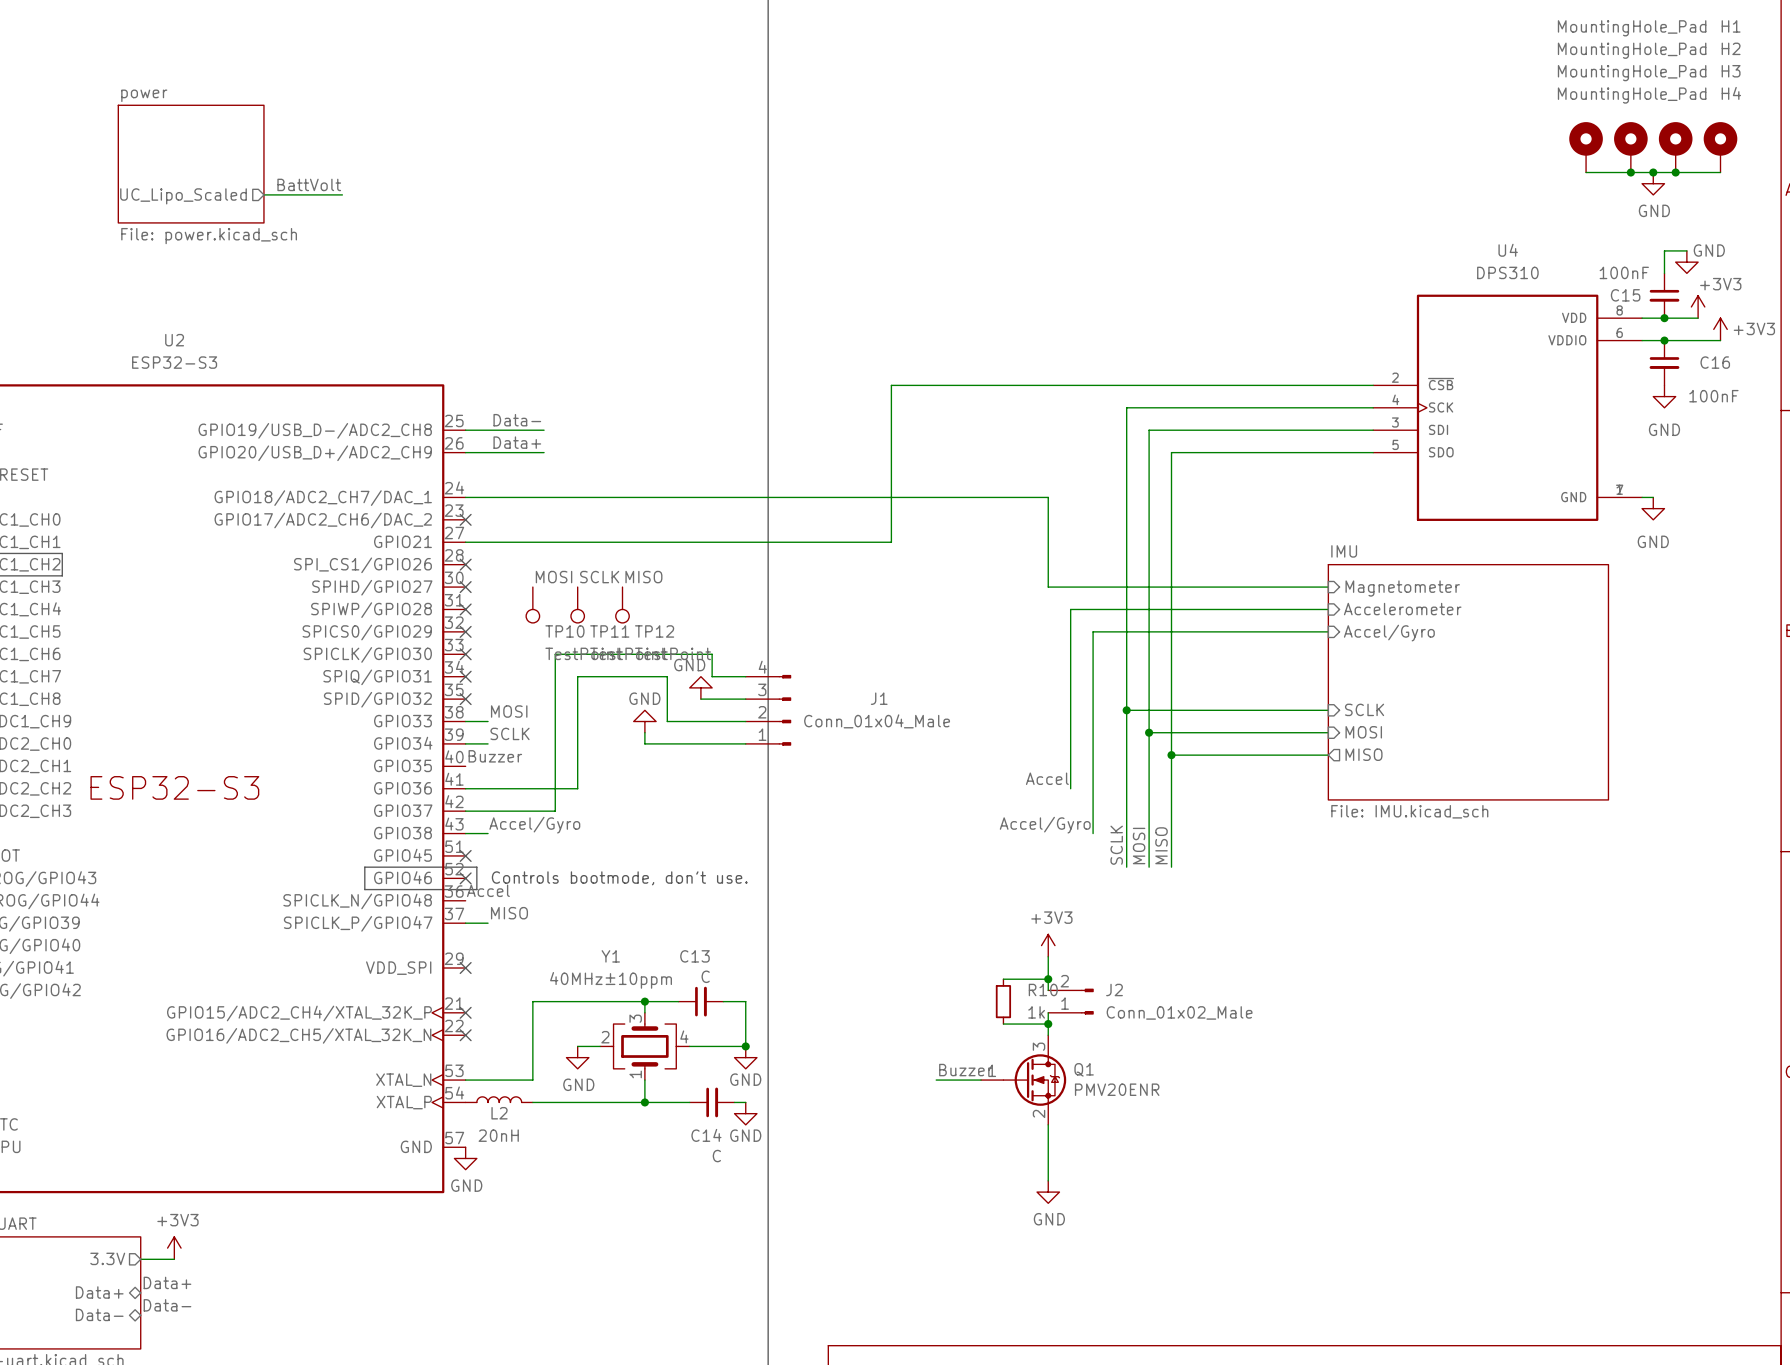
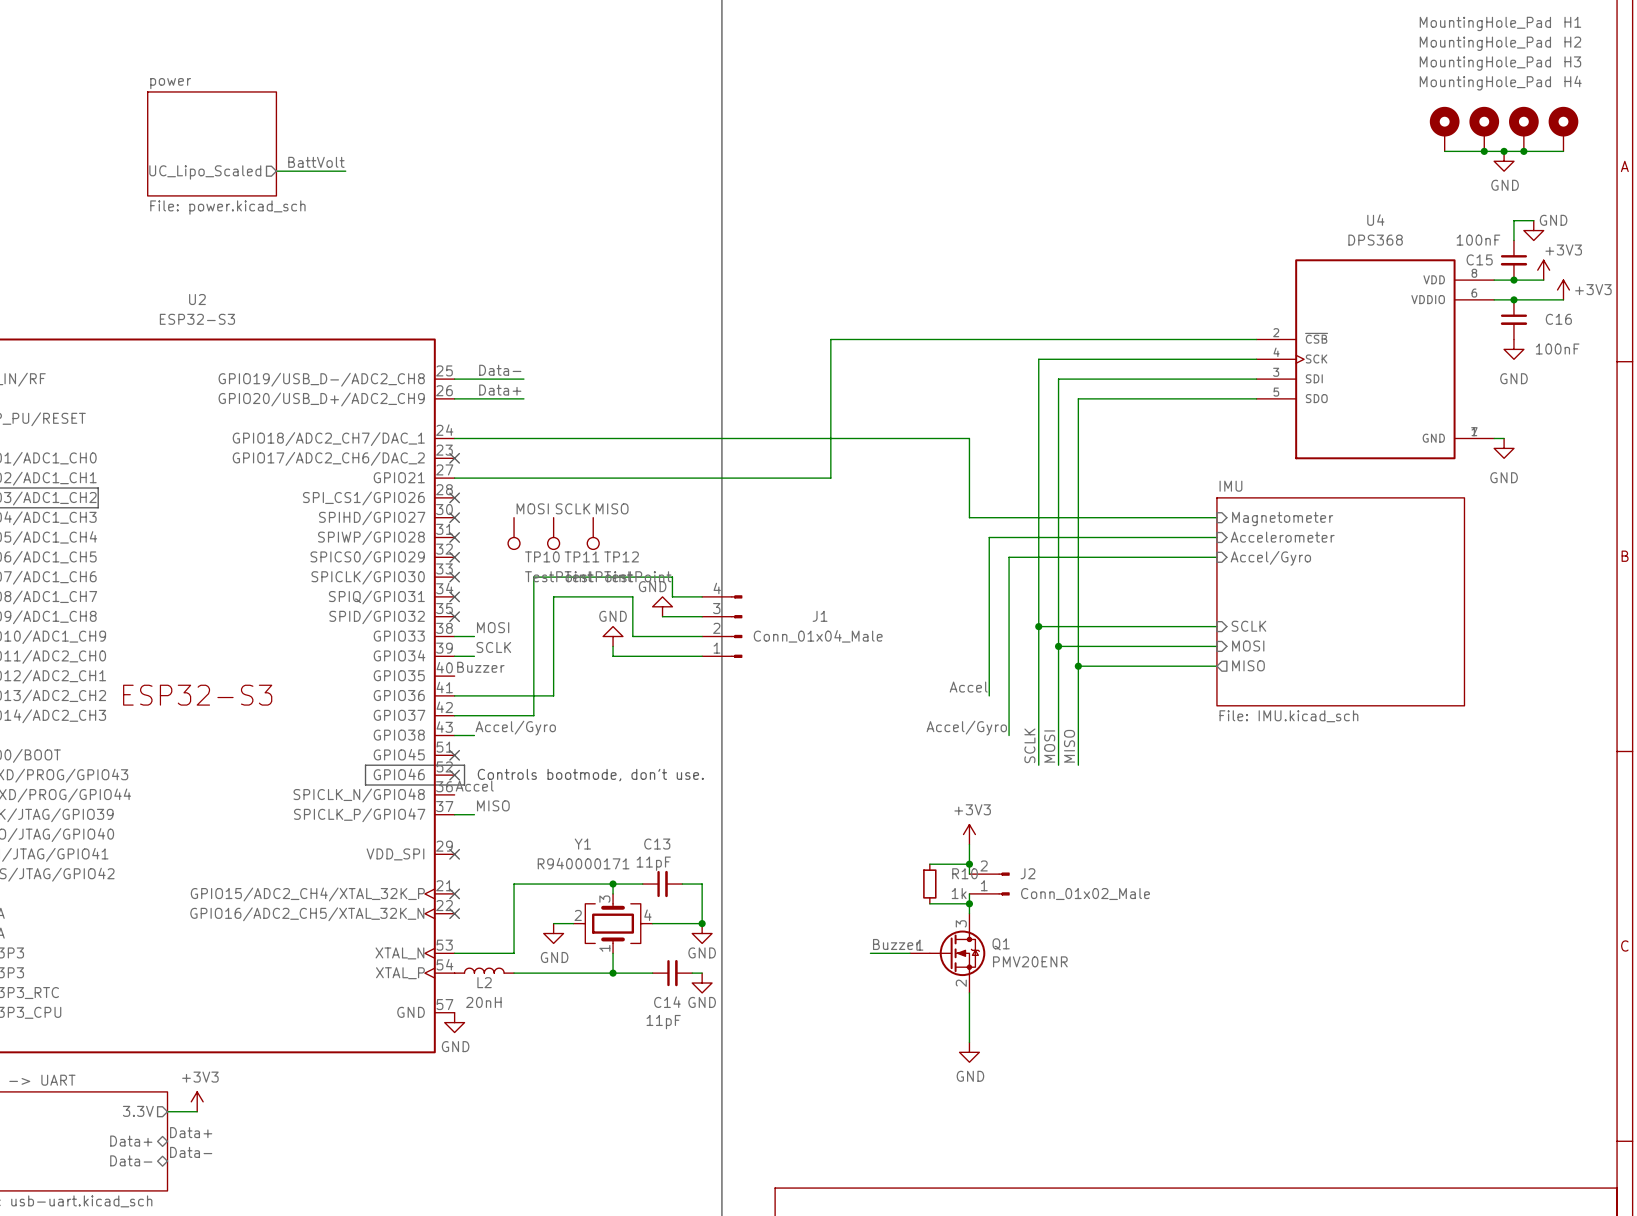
U4 value: DPS310 (1507, 272) -> DPS368 (1375, 240)
C13 value: C (705, 976) -> 11pF (653, 863)
Y1 value: 40MHz±10ppm (611, 980) -> R940000171 (583, 863)
C14 value: C (716, 1156) -> 11pF (663, 1022)

